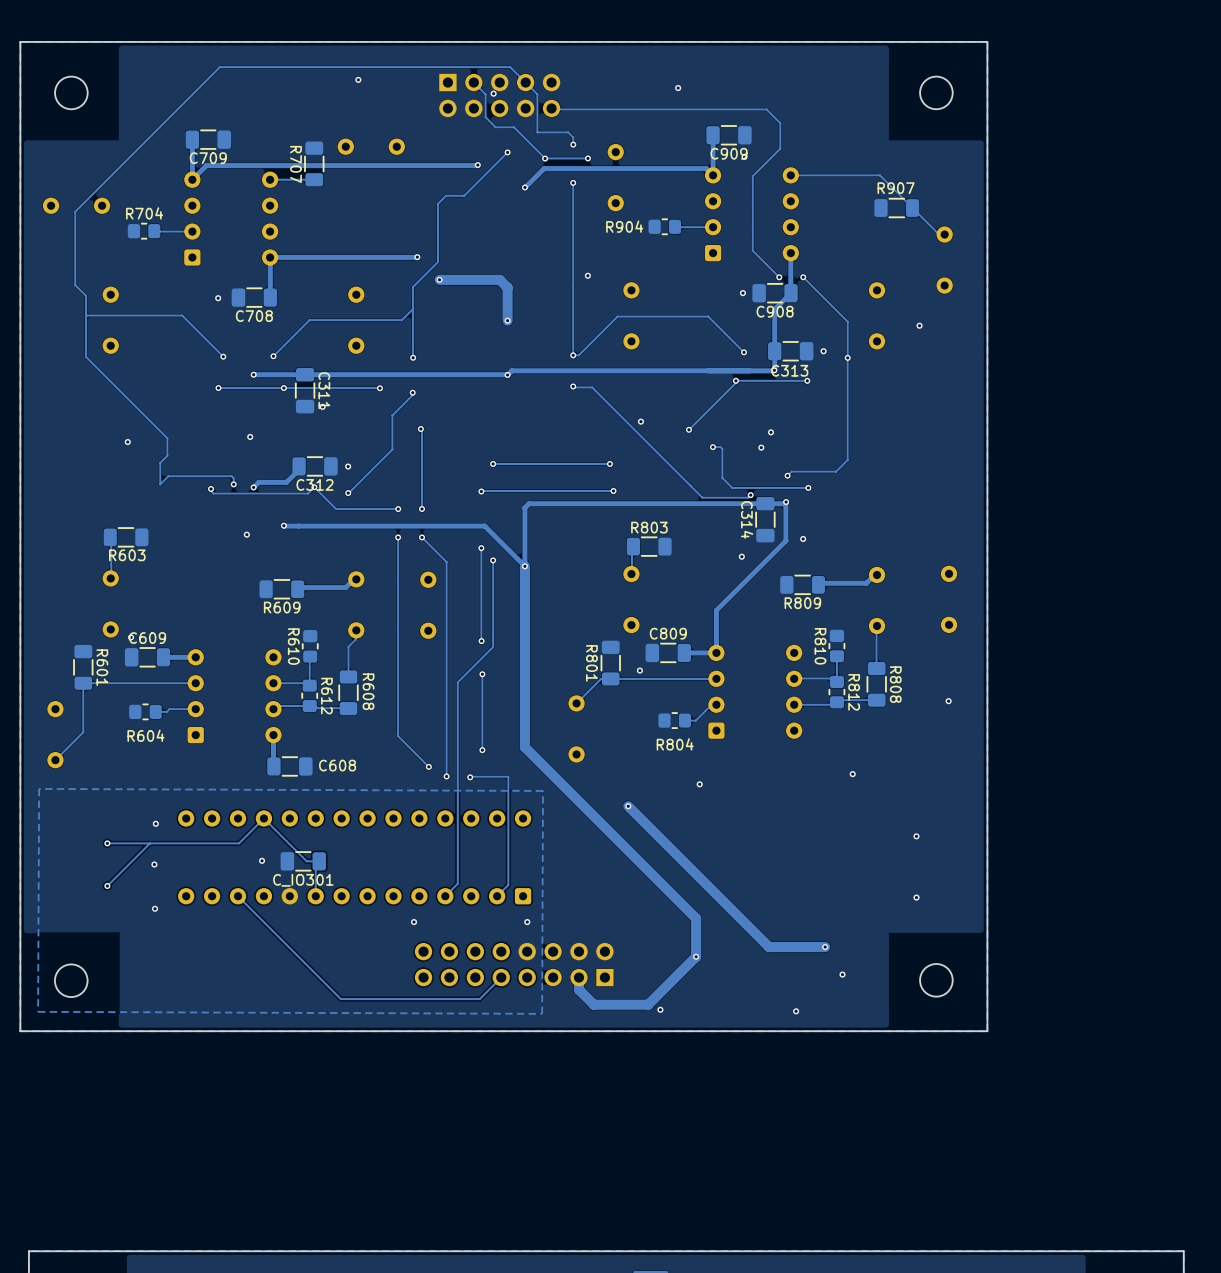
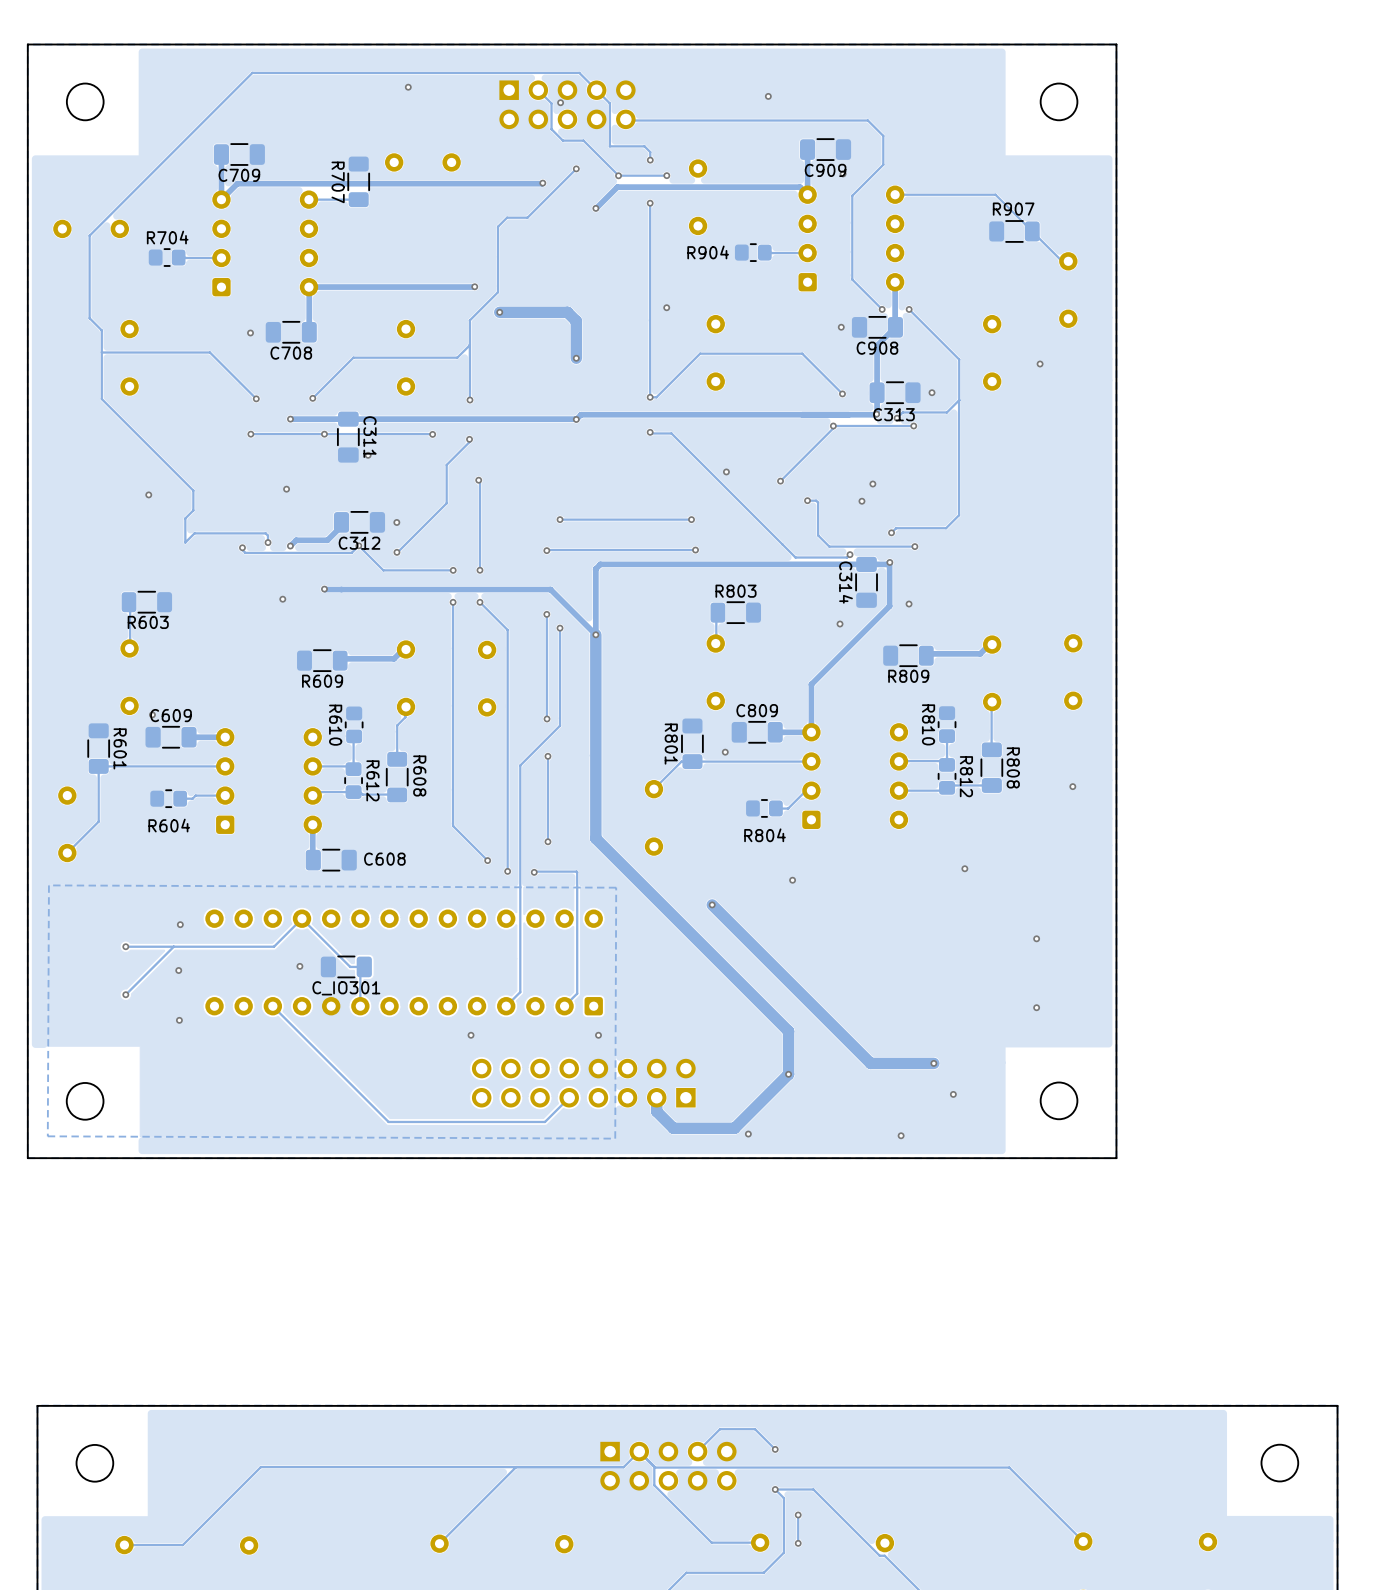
track: none -> (959, 400) (946, 412) (902, 412) (897, 418)
via position: (847, 357) -> (897, 418)

